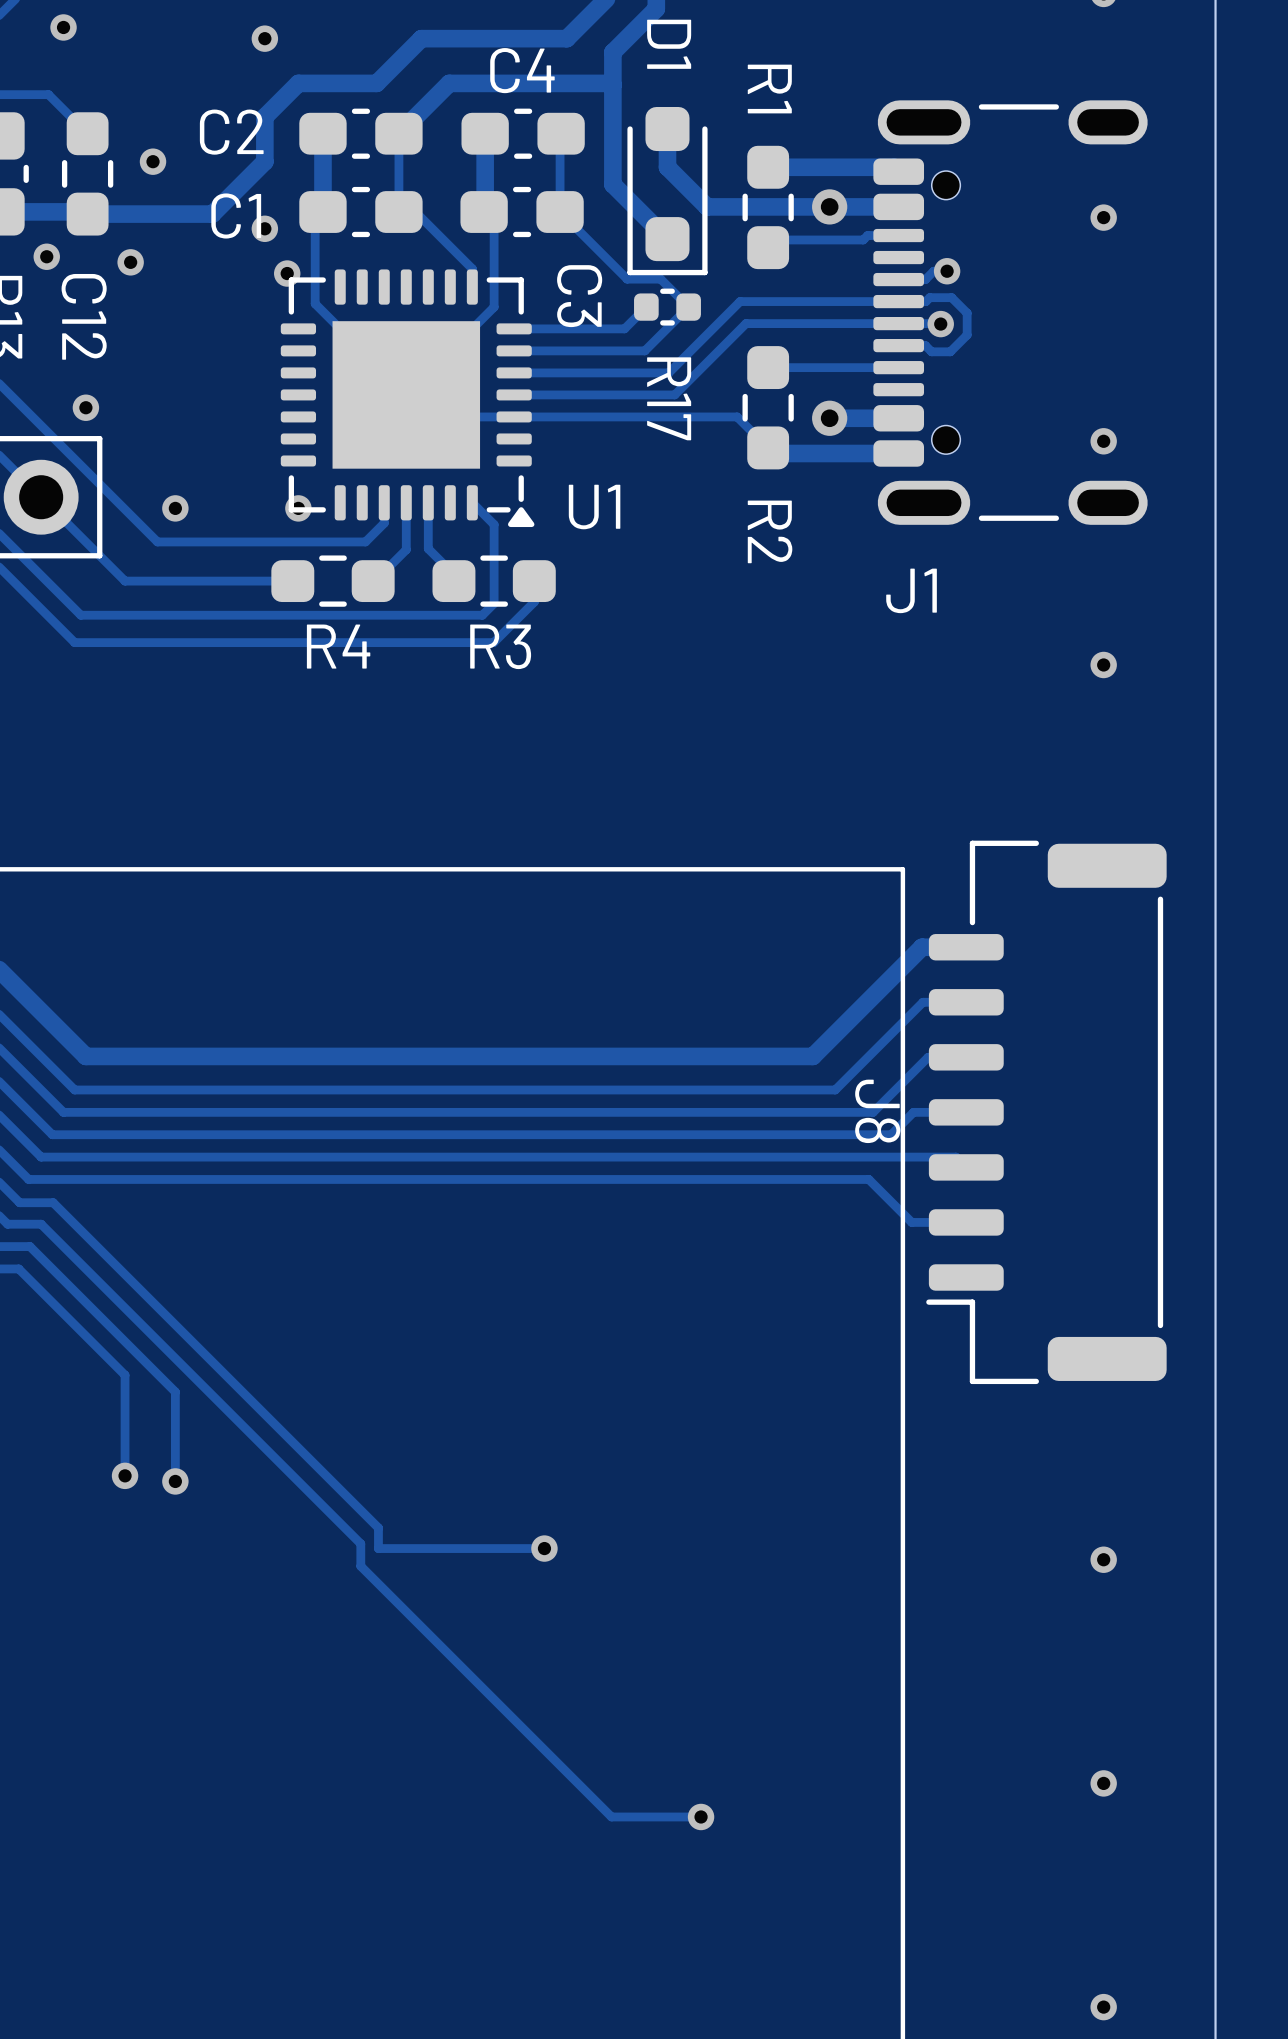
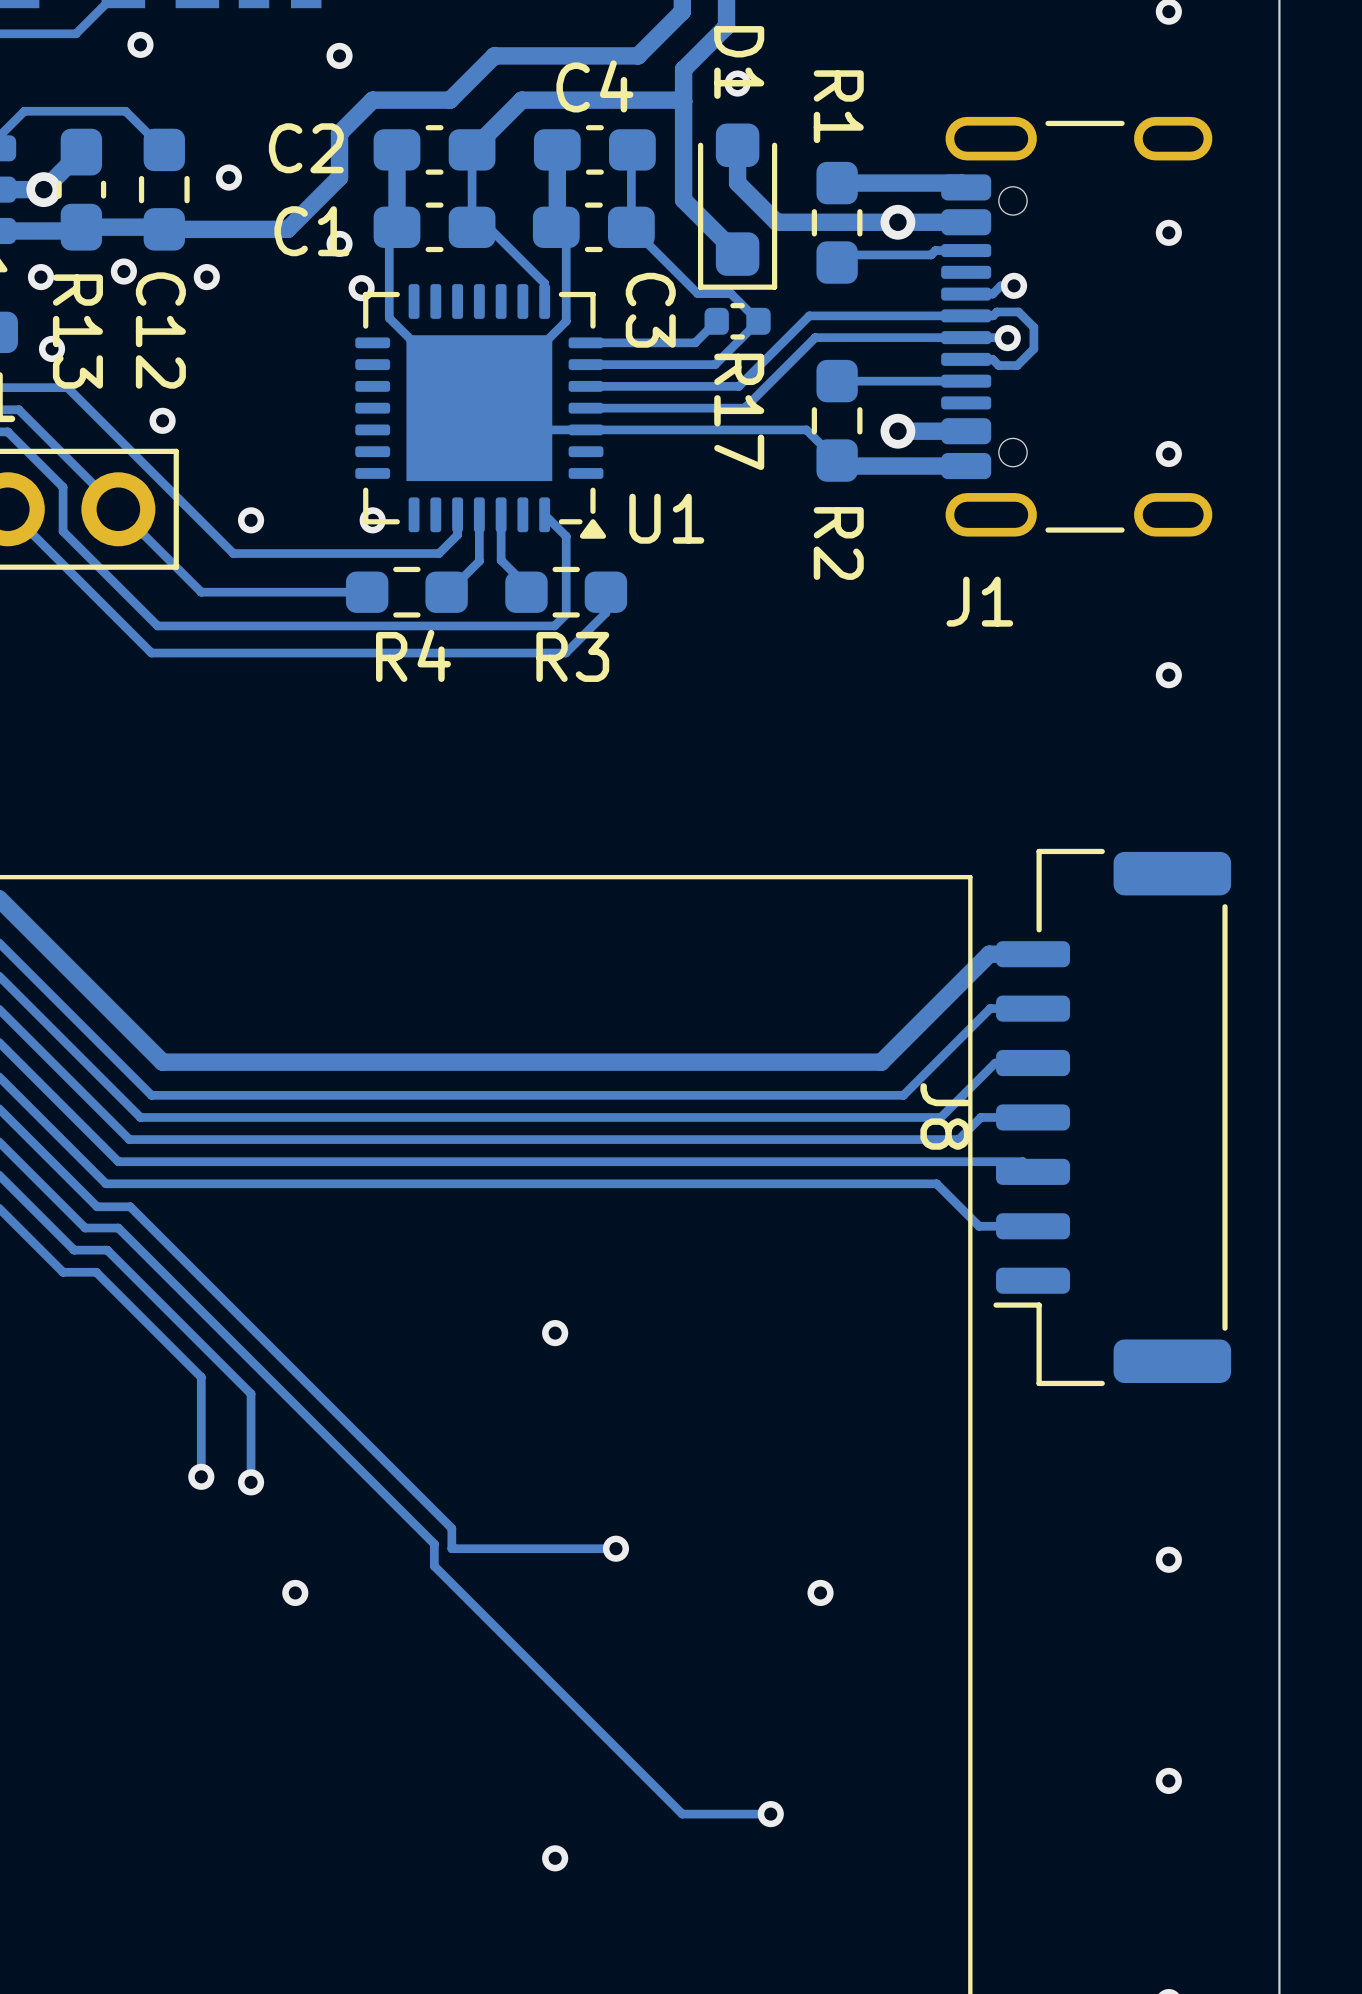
via: none -> (737, 83)
via: none -> (555, 1333)
via: none -> (295, 1592)
via: none -> (820, 1592)
via: none -> (555, 1858)

